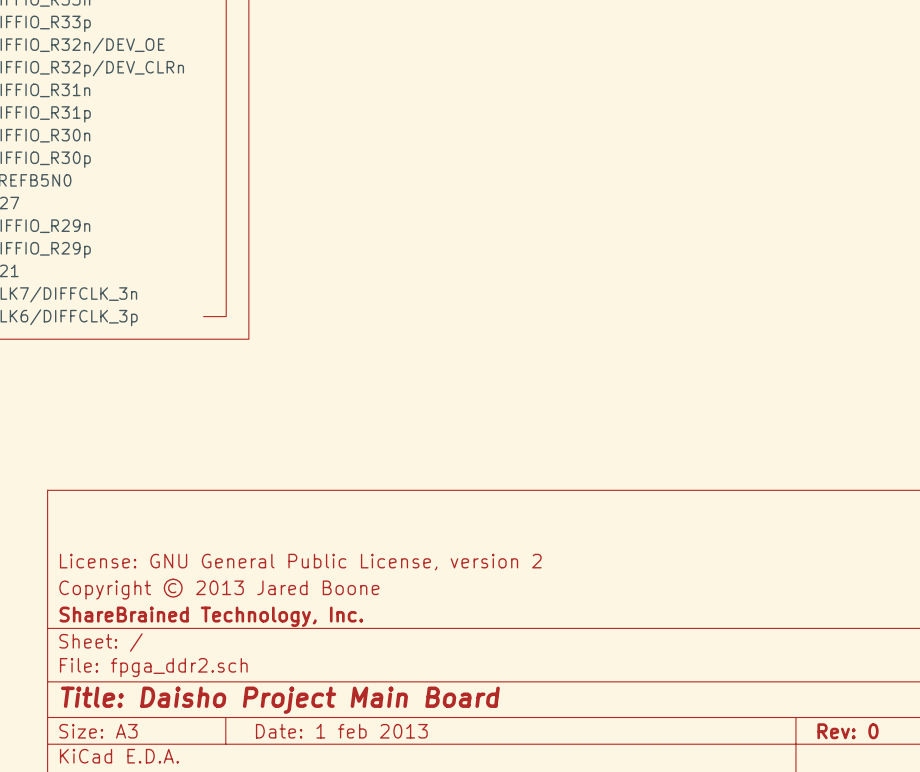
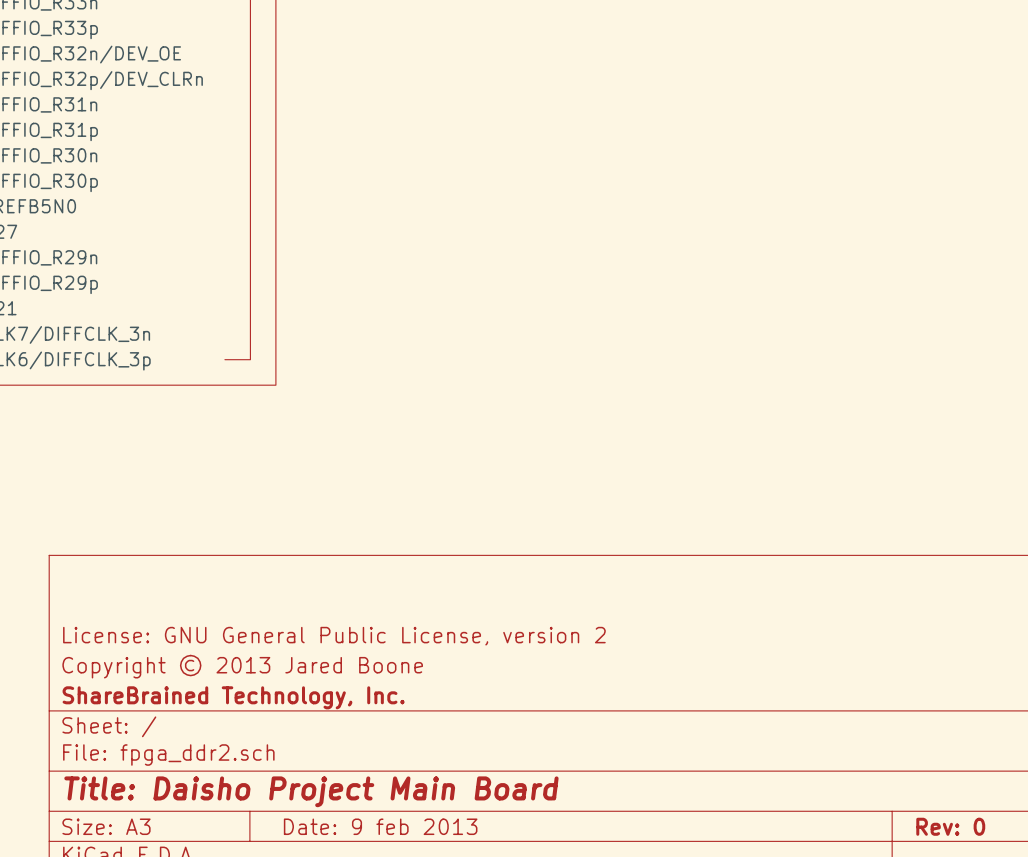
title block: Date: 1 feb 2013 (341, 731) -> Date: 9 feb 2013 (380, 826)

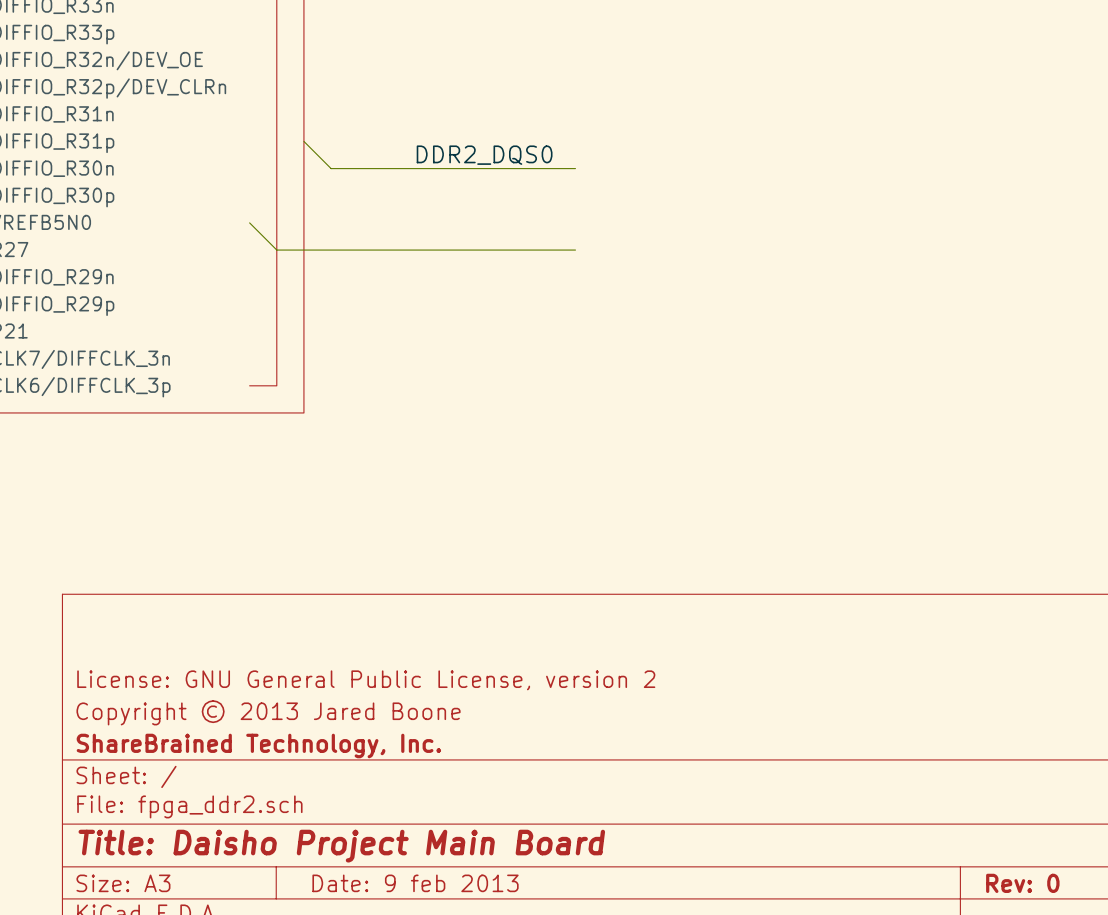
wire: none -> (303, 141) (331, 168) (575, 168)
label: none -> DDR2_DQS0 (484, 155)
wire: none -> (249, 222) (276, 250) (575, 250)

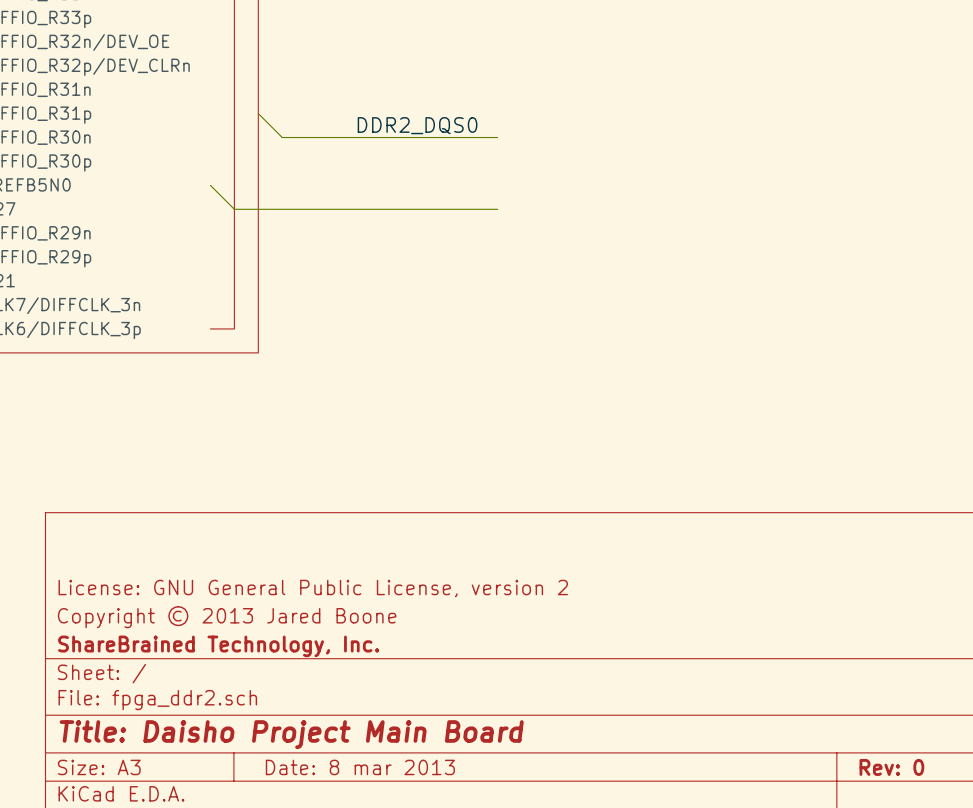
title block: Date: 9 feb 2013 (415, 883) -> Date: 8 mar 2013 (360, 767)

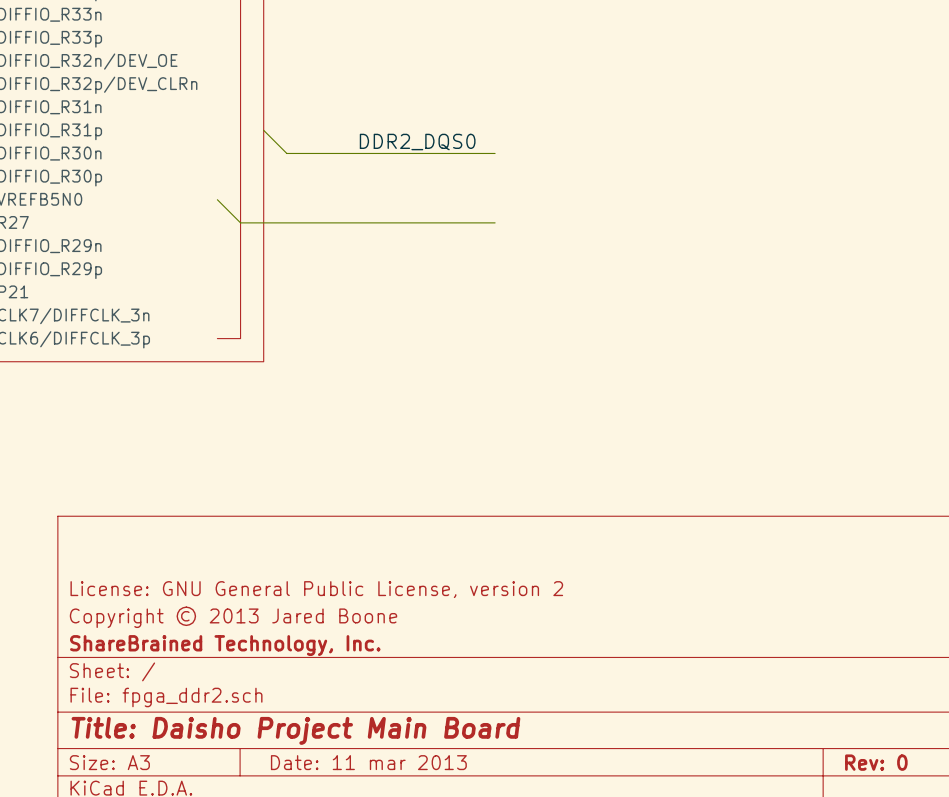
title block: Date: 8 mar 2013 (360, 767) -> Date: 11 mar 2013 (368, 762)

